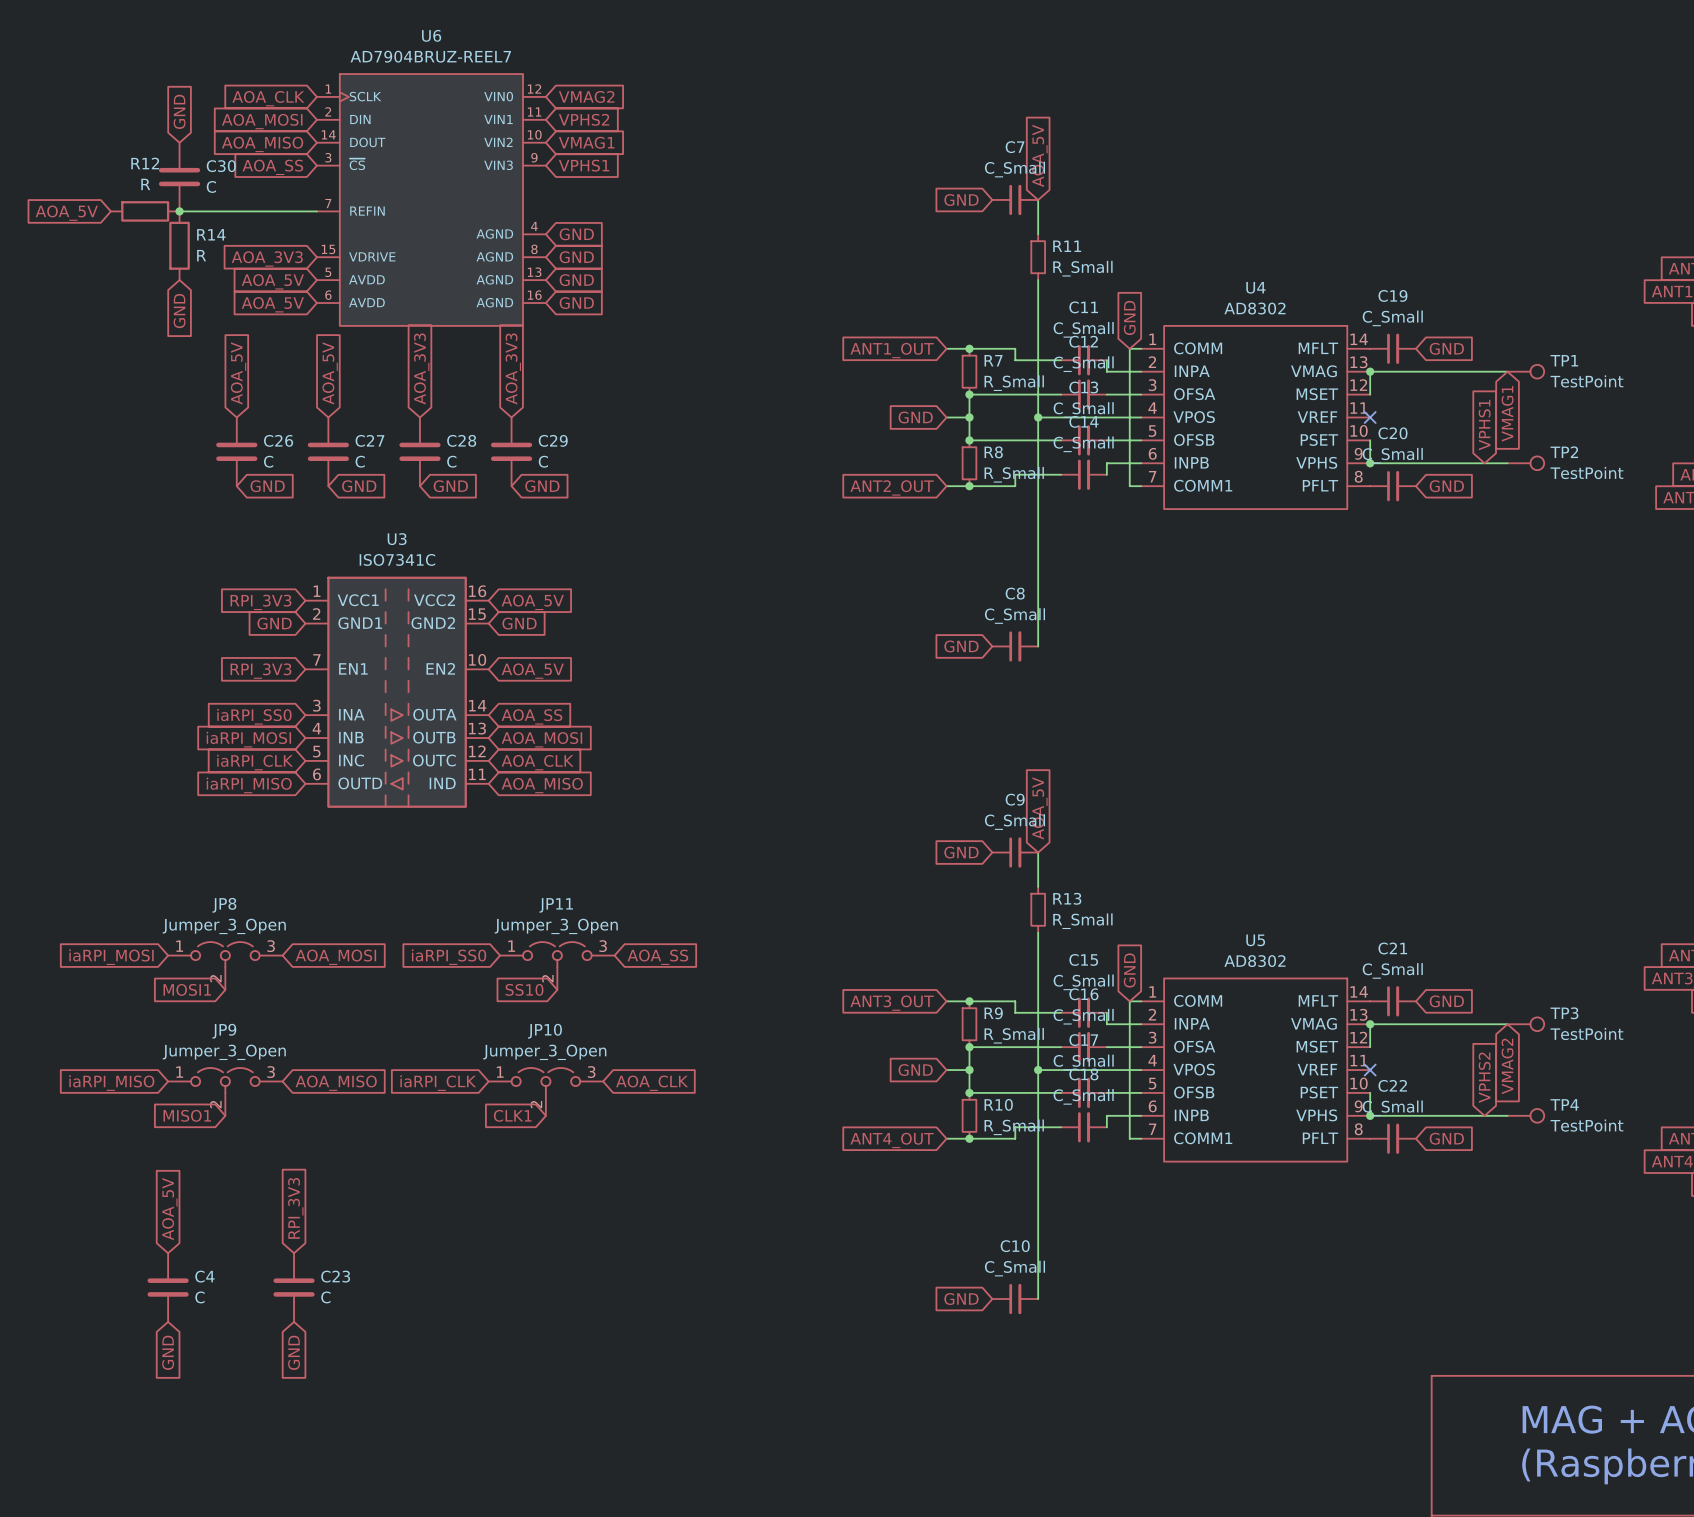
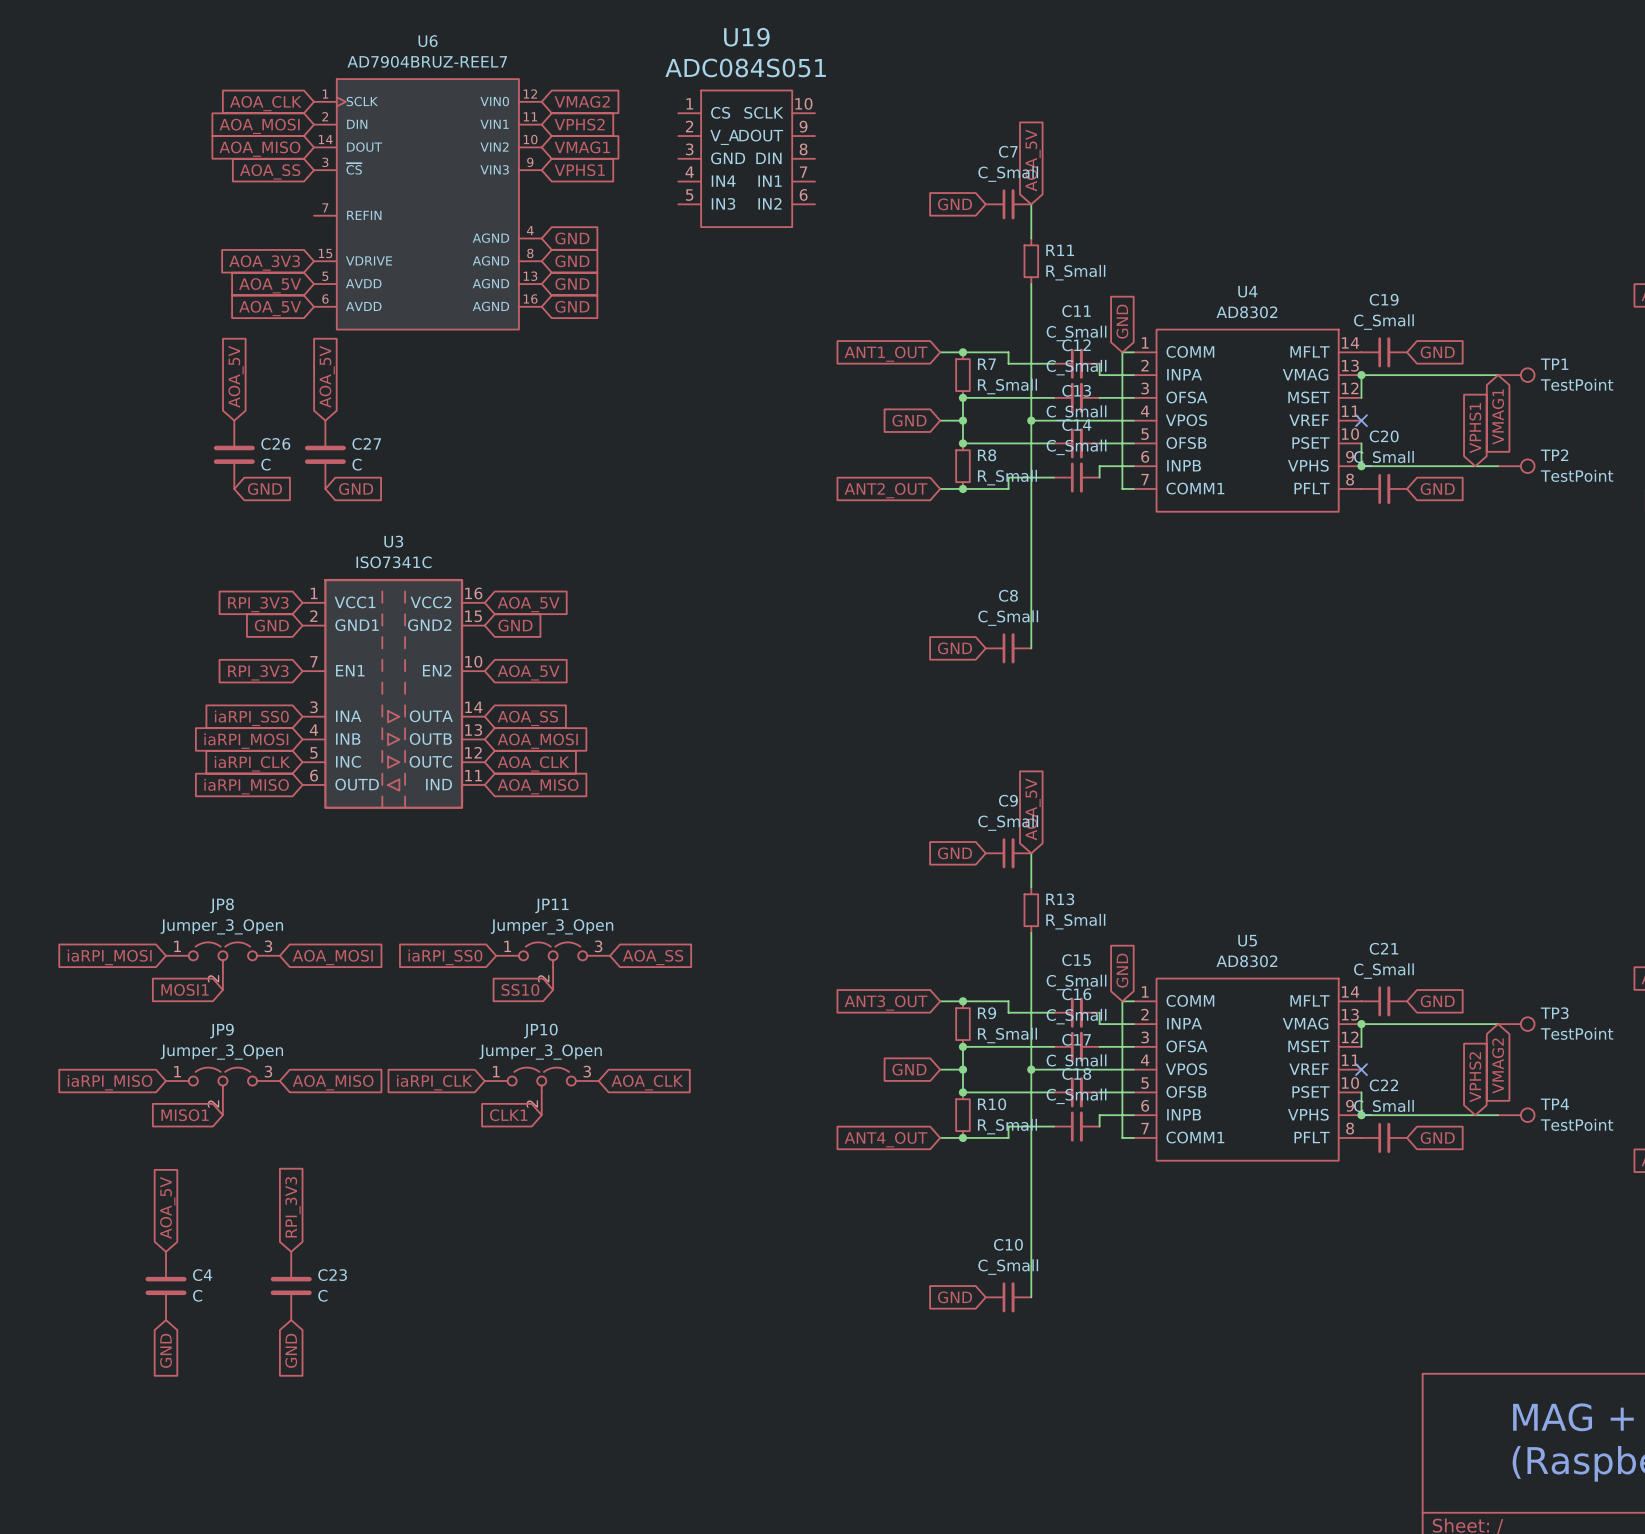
global label: GND (179, 111) -> none
U19: none -> ADC084S051 (746, 158)
C30: C (179, 177) -> none
R12: R (145, 211) -> none
wire: (179, 211) (316, 211) -> none
junction: (179, 211) -> none
global label: AOA_5V (66, 213) -> none
R14: R (179, 245) -> none
global label: GND (179, 311) -> none
global label: AOA_3V3 (421, 368) -> none
global label: AOA_3V3 (513, 368) -> none
C28: C (419, 451) -> none
C29: C (511, 451) -> none
global label: GND (450, 486) -> none
global label: GND (542, 486) -> none

